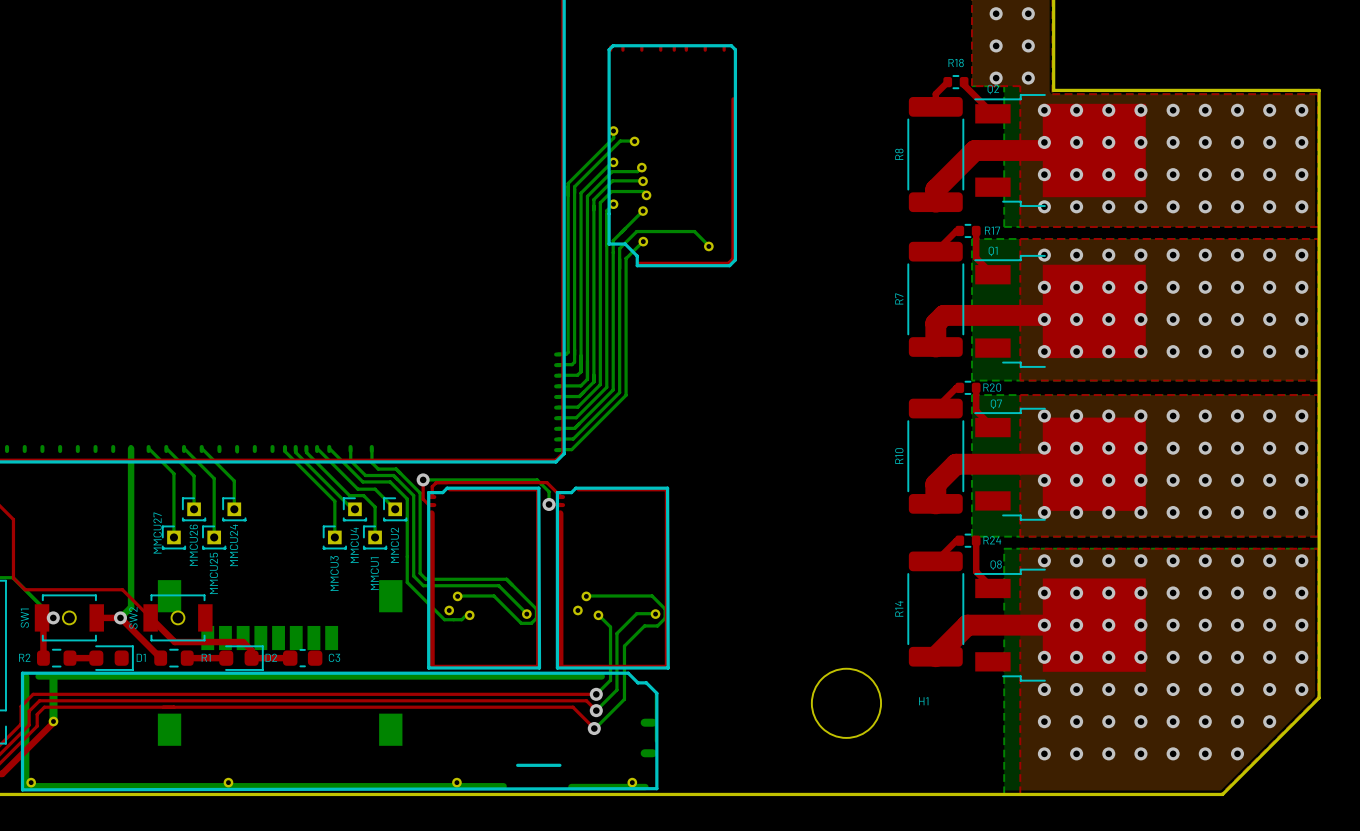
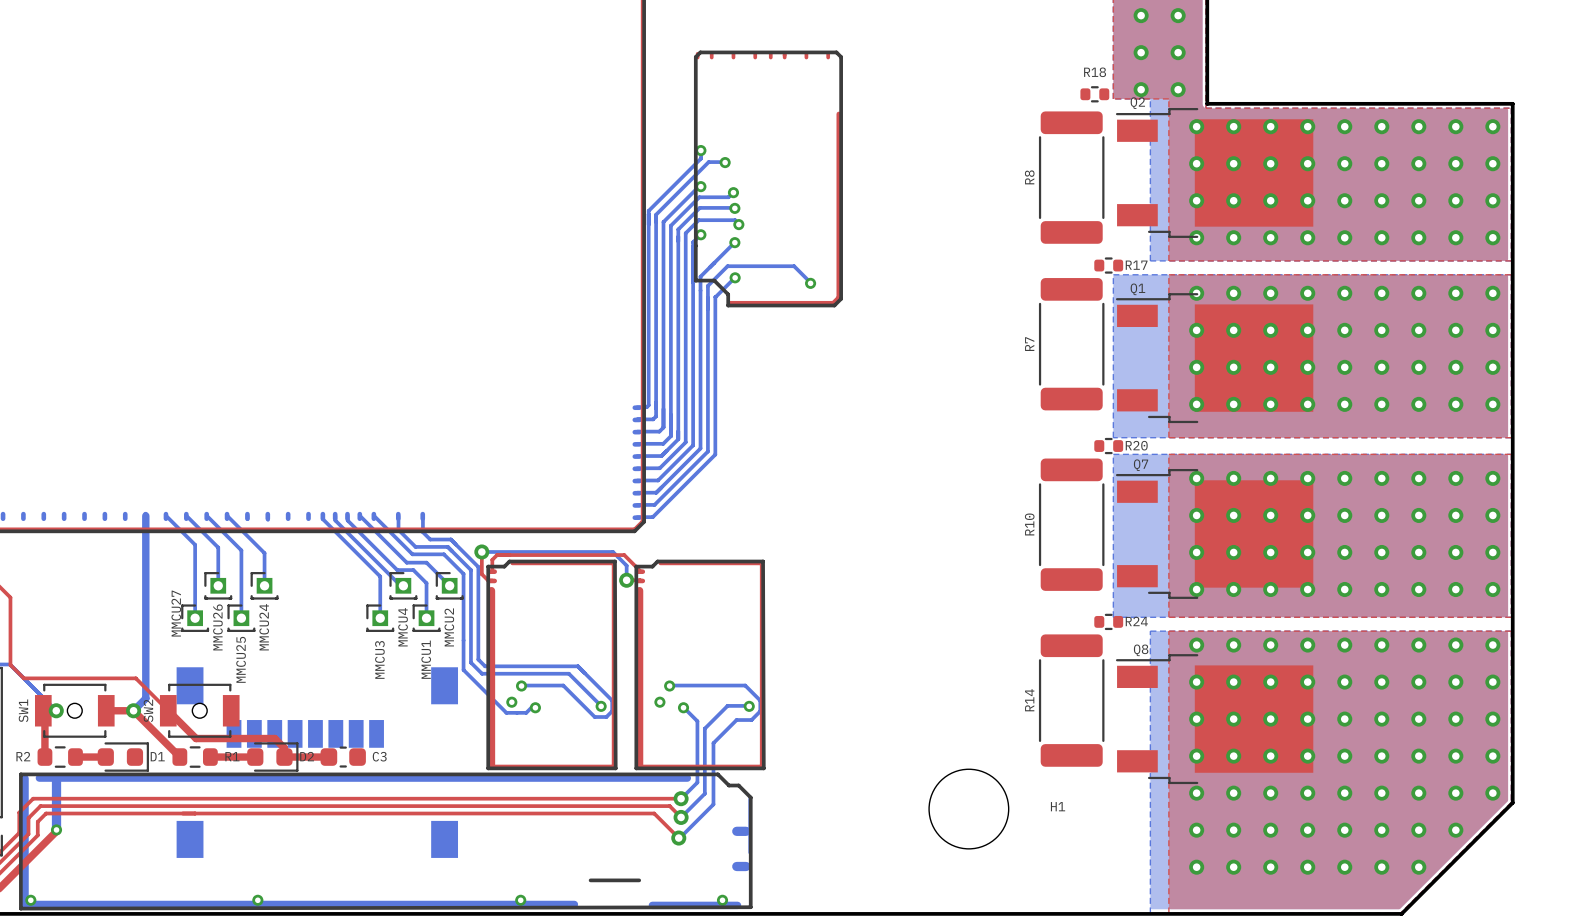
top track: (947, 82) (935, 94) (935, 106) -> none
top track: (964, 82) (964, 85) (992, 113) -> none
top track: (1094, 150) (974, 150) (935, 189) (935, 202) -> none
top track: (959, 230) (956, 230) (935, 251) -> none
top track: (976, 230) (976, 257) (992, 274) -> none
top track: (1108, 319) (1104, 315) (943, 315) (935, 323) (935, 347) -> none
top track: (959, 387) (956, 387) (935, 408) -> none
top track: (976, 387) (976, 410) (992, 427) -> none
top track: (1094, 464) (955, 464) (935, 484) (935, 503) -> none
top track: (959, 540) (956, 540) (935, 561) -> none
top track: (976, 540) (976, 571) (992, 588) -> none
top track: (1094, 625) (967, 625) (935, 656) -> none

